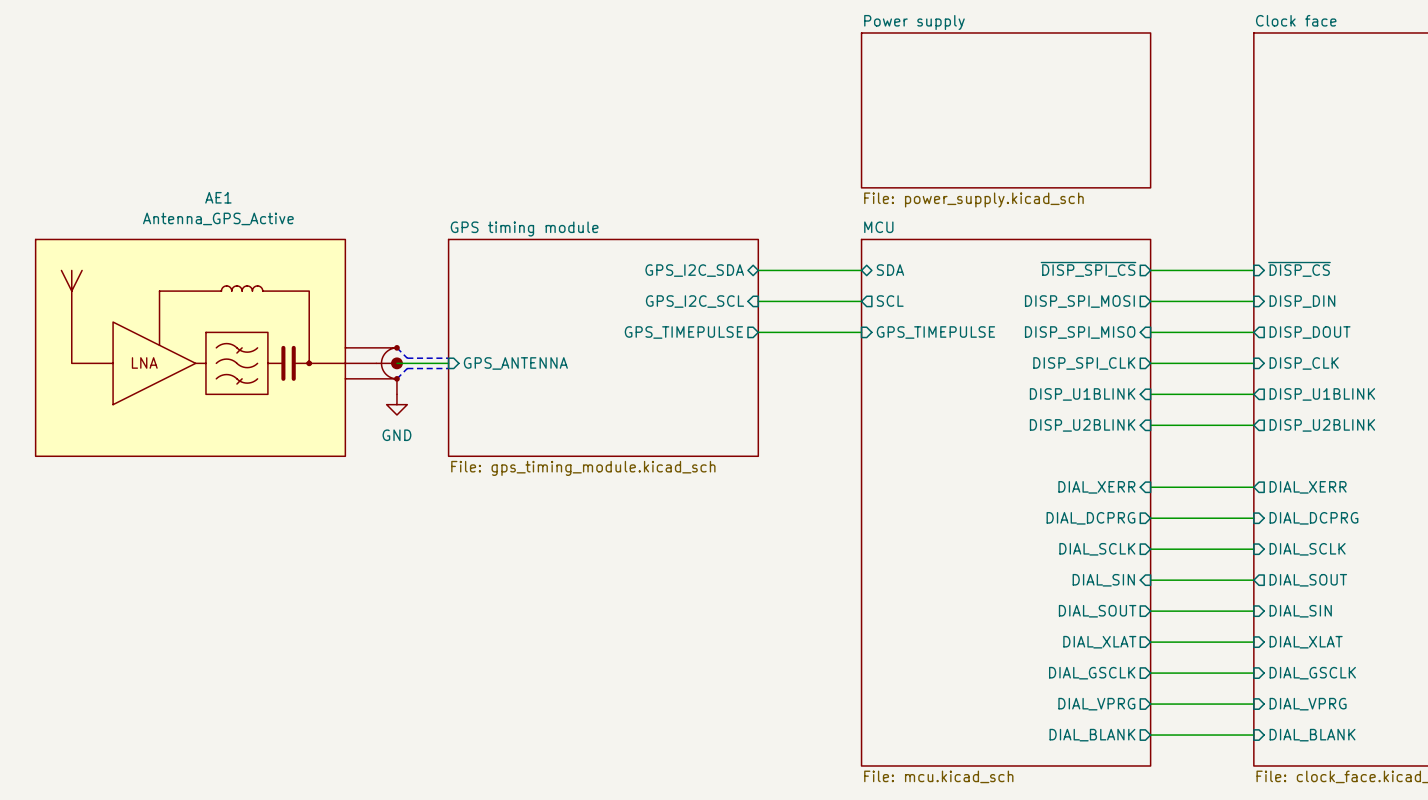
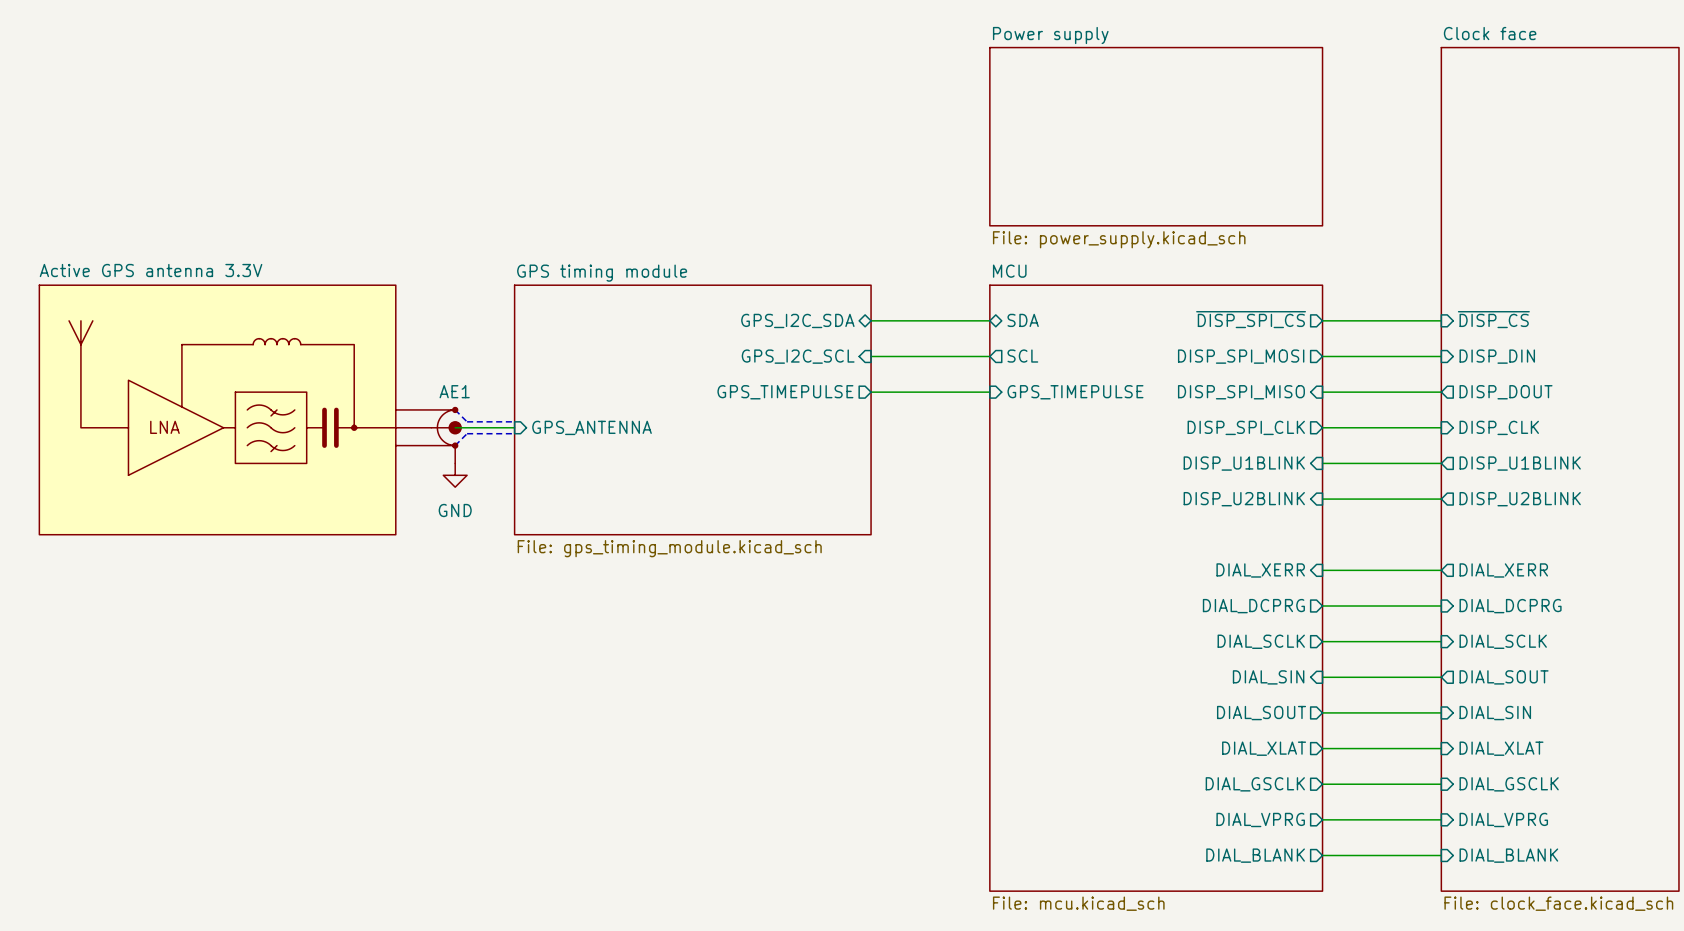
AE1 name position: AE1 (218, 197) -> AE1 (454, 391)
AE1 value: Antenna_GPS_Active (218, 218) -> Active GPS antenna 3.3V (151, 270)

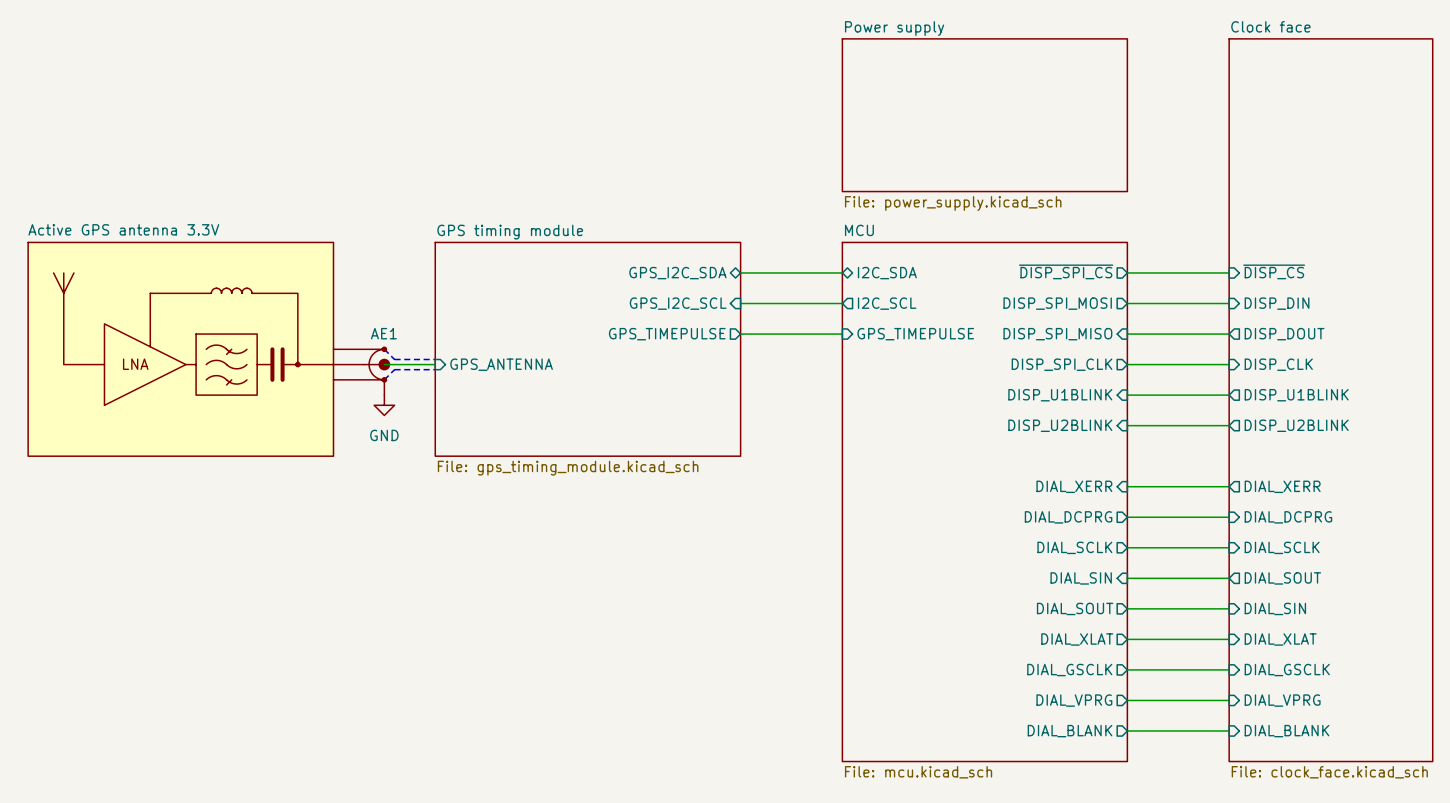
sheet pin: SDA (1023, 320) -> I2C_SDA (887, 273)
sheet pin: SCL (1022, 356) -> I2C_SCL (887, 303)

